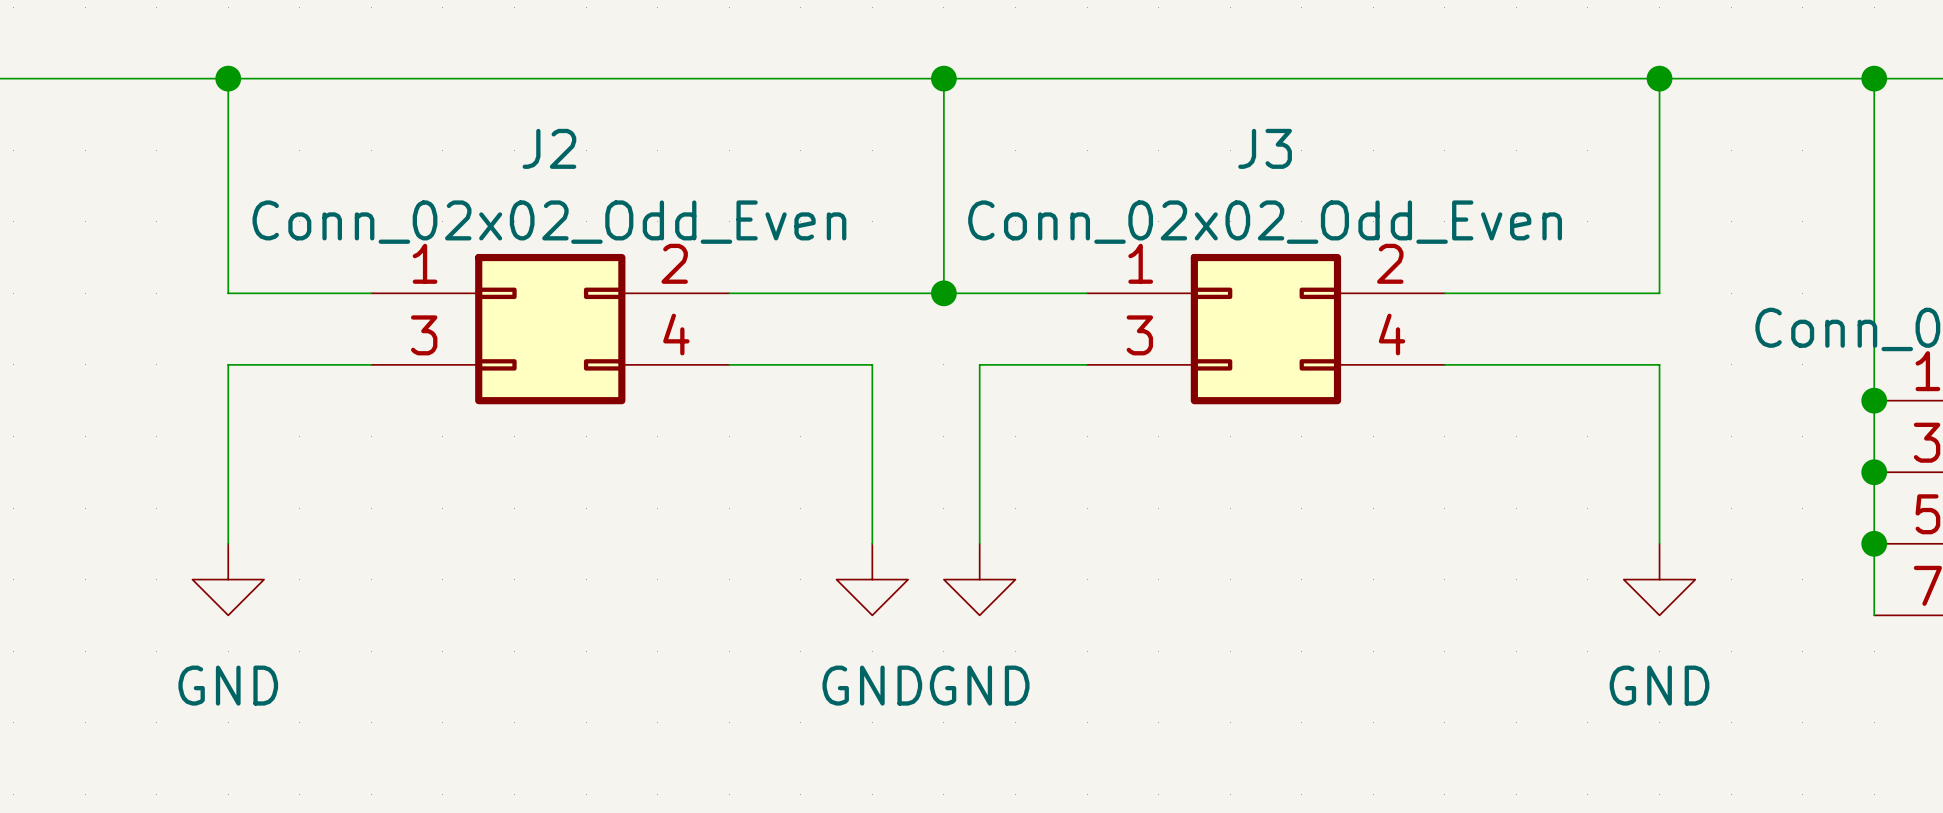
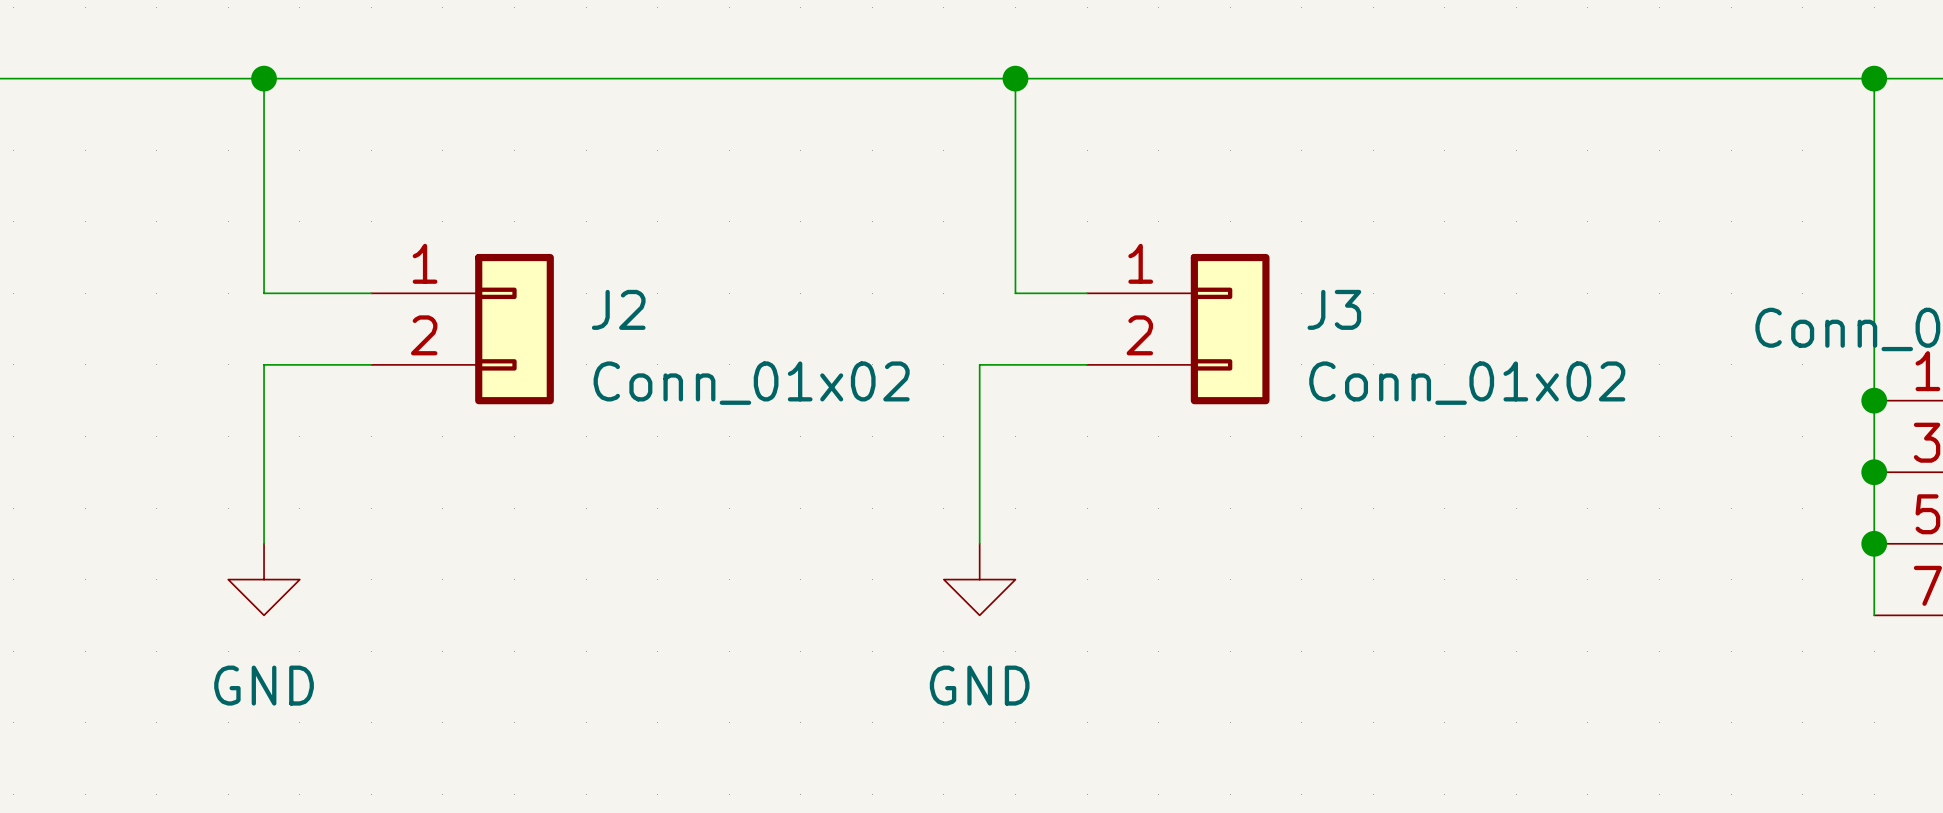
wire: (228, 78) (228, 293) (264, 293) -> (264, 78) (264, 293)
junction position: (228, 78) -> (264, 78)
wire: (943, 78) (943, 293) -> none
junction position: (943, 78) -> (1015, 78)
wire: (1659, 78) (1659, 293) (1444, 293) -> none
junction: (1659, 78) -> none
J2 name position: J2 (549, 148) -> J2 (618, 309)
J3 name position: J3 (1265, 148) -> J3 (1334, 309)
J2 value: Conn_02x02_Odd_Even (549, 222) -> Conn_01x02 (751, 383)
J3 value: Conn_02x02_Odd_Even (1265, 222) -> Conn_01x02 (1467, 383)
J2 symbol: [371, 253, 730, 405] -> [371, 253, 554, 405]
J3 symbol: [1087, 253, 1445, 405] -> [1087, 253, 1270, 405]
wire: (729, 293) (1015, 293) -> (1015, 78) (1015, 293)
junction: (943, 293) -> none
wire: (264, 364) (228, 364) (228, 543) -> (264, 364) (264, 543)
wire: (729, 364) (872, 364) (872, 543) -> none
wire: (1444, 364) (1659, 364) (1659, 543) -> none
power symbol position: GND (228, 579) -> GND (264, 579)
power symbol: GND (872, 579) -> none
power symbol: GND (1659, 579) -> none

